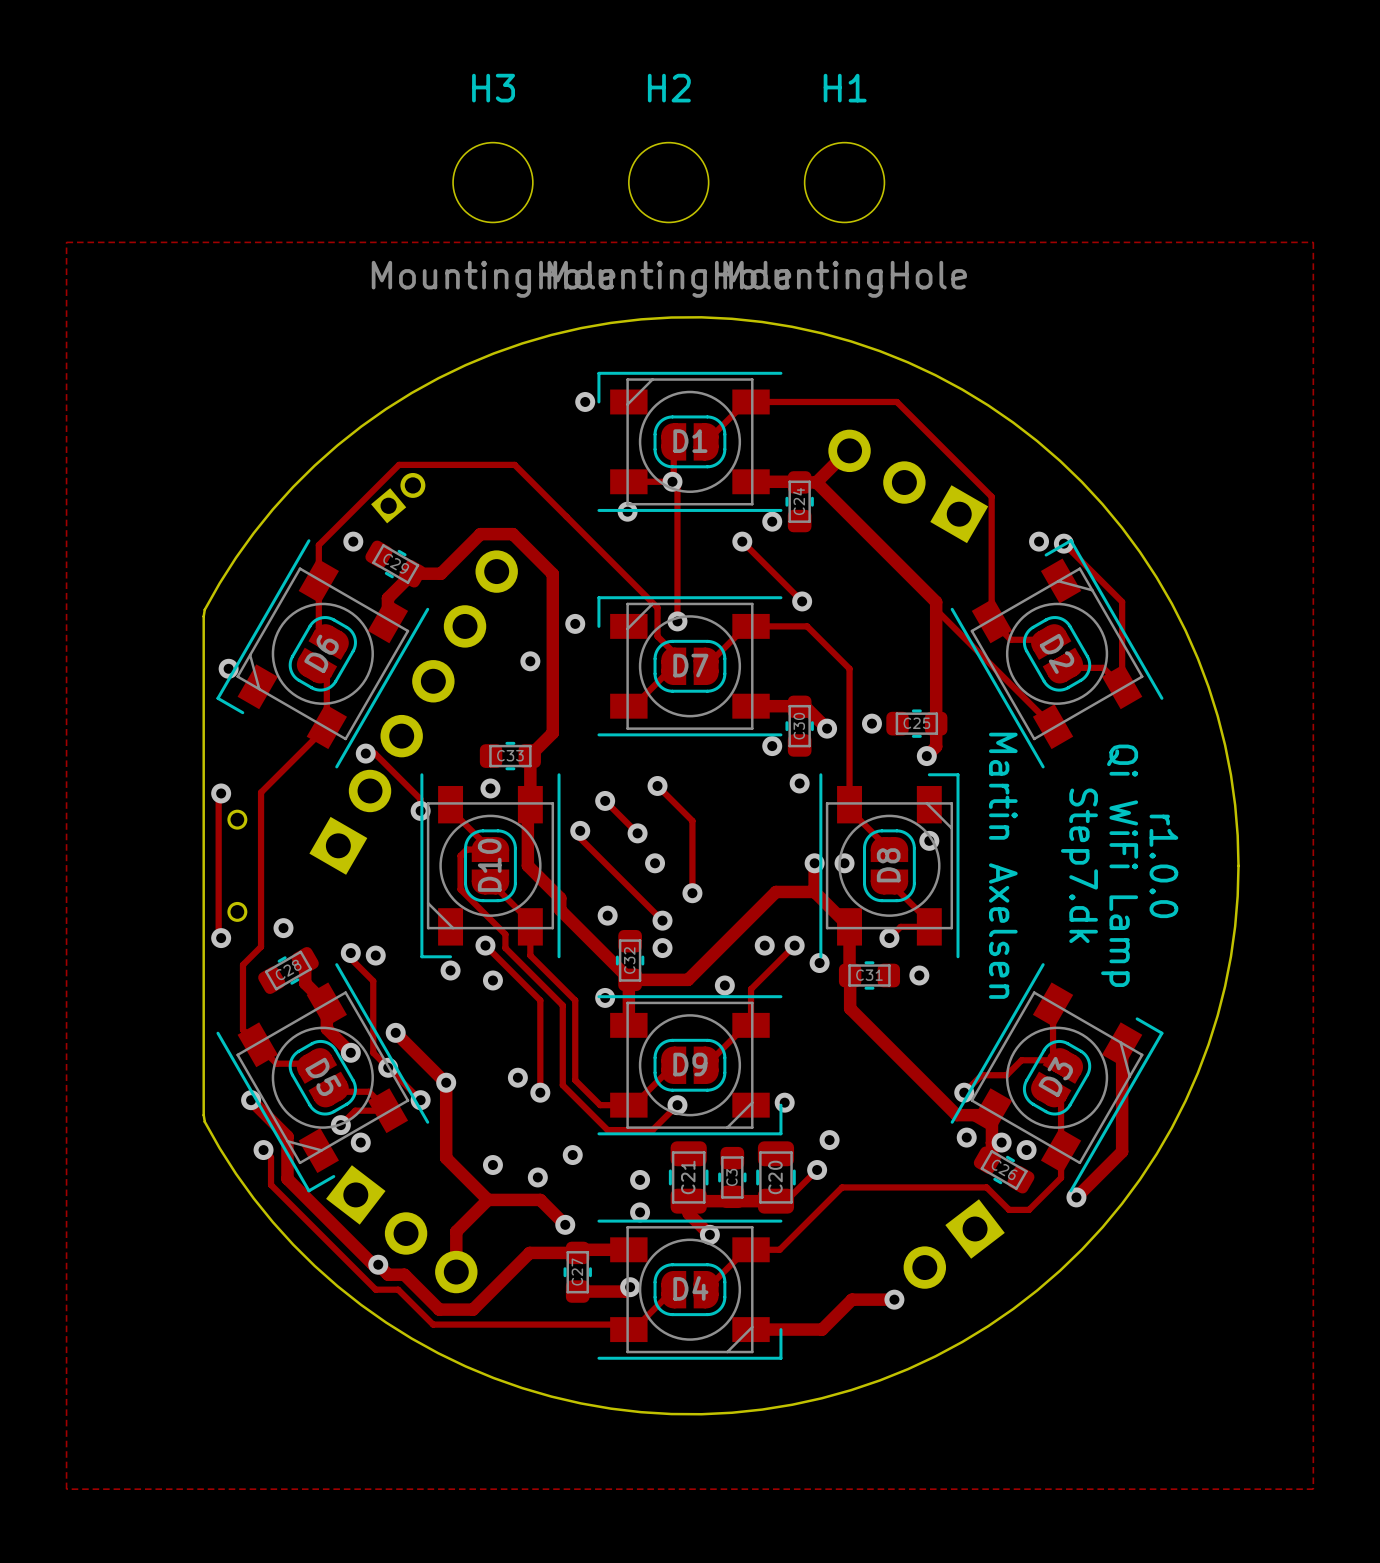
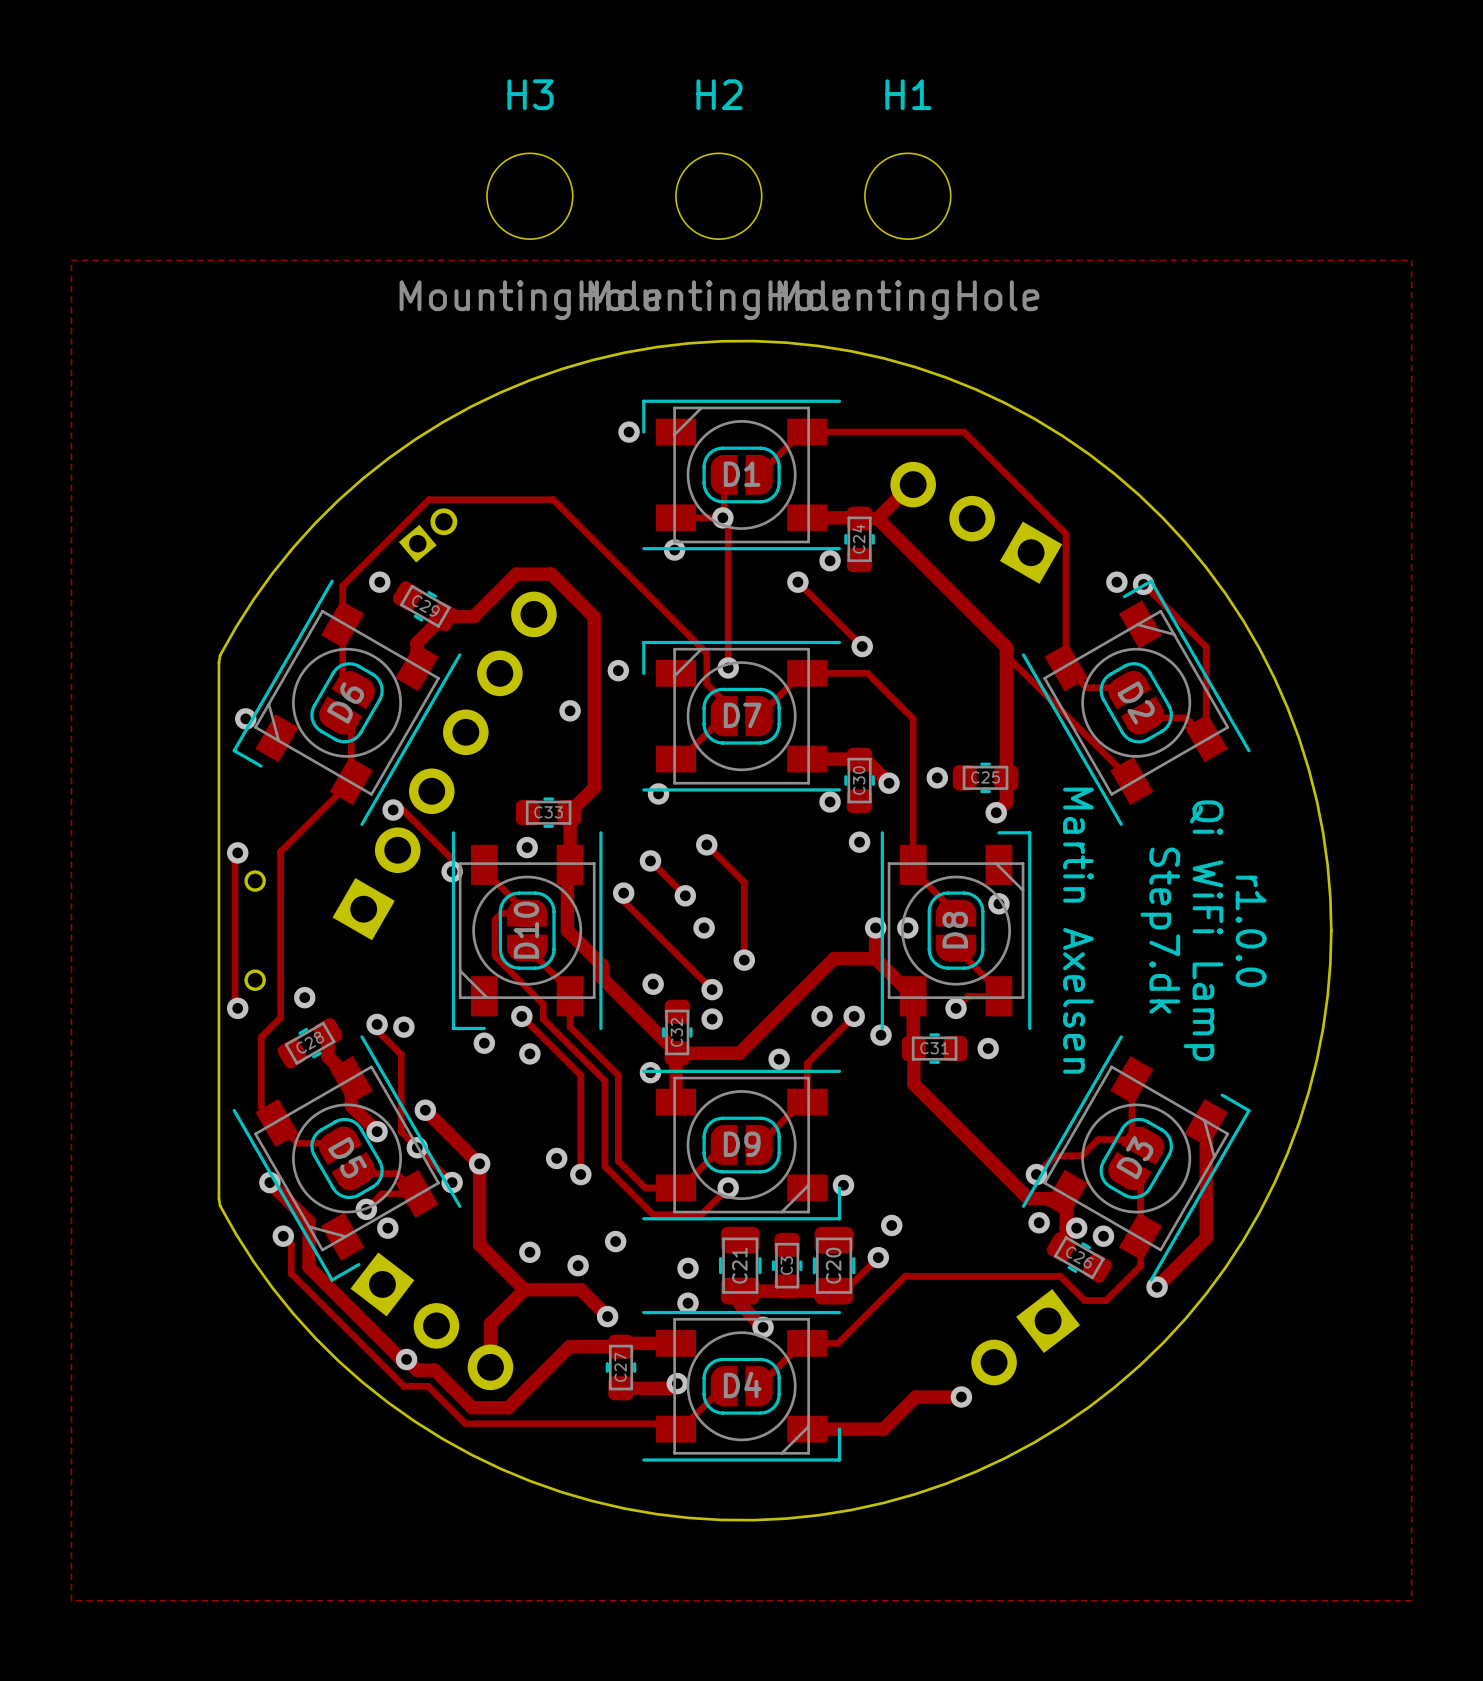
via: none -> (658, 793)

